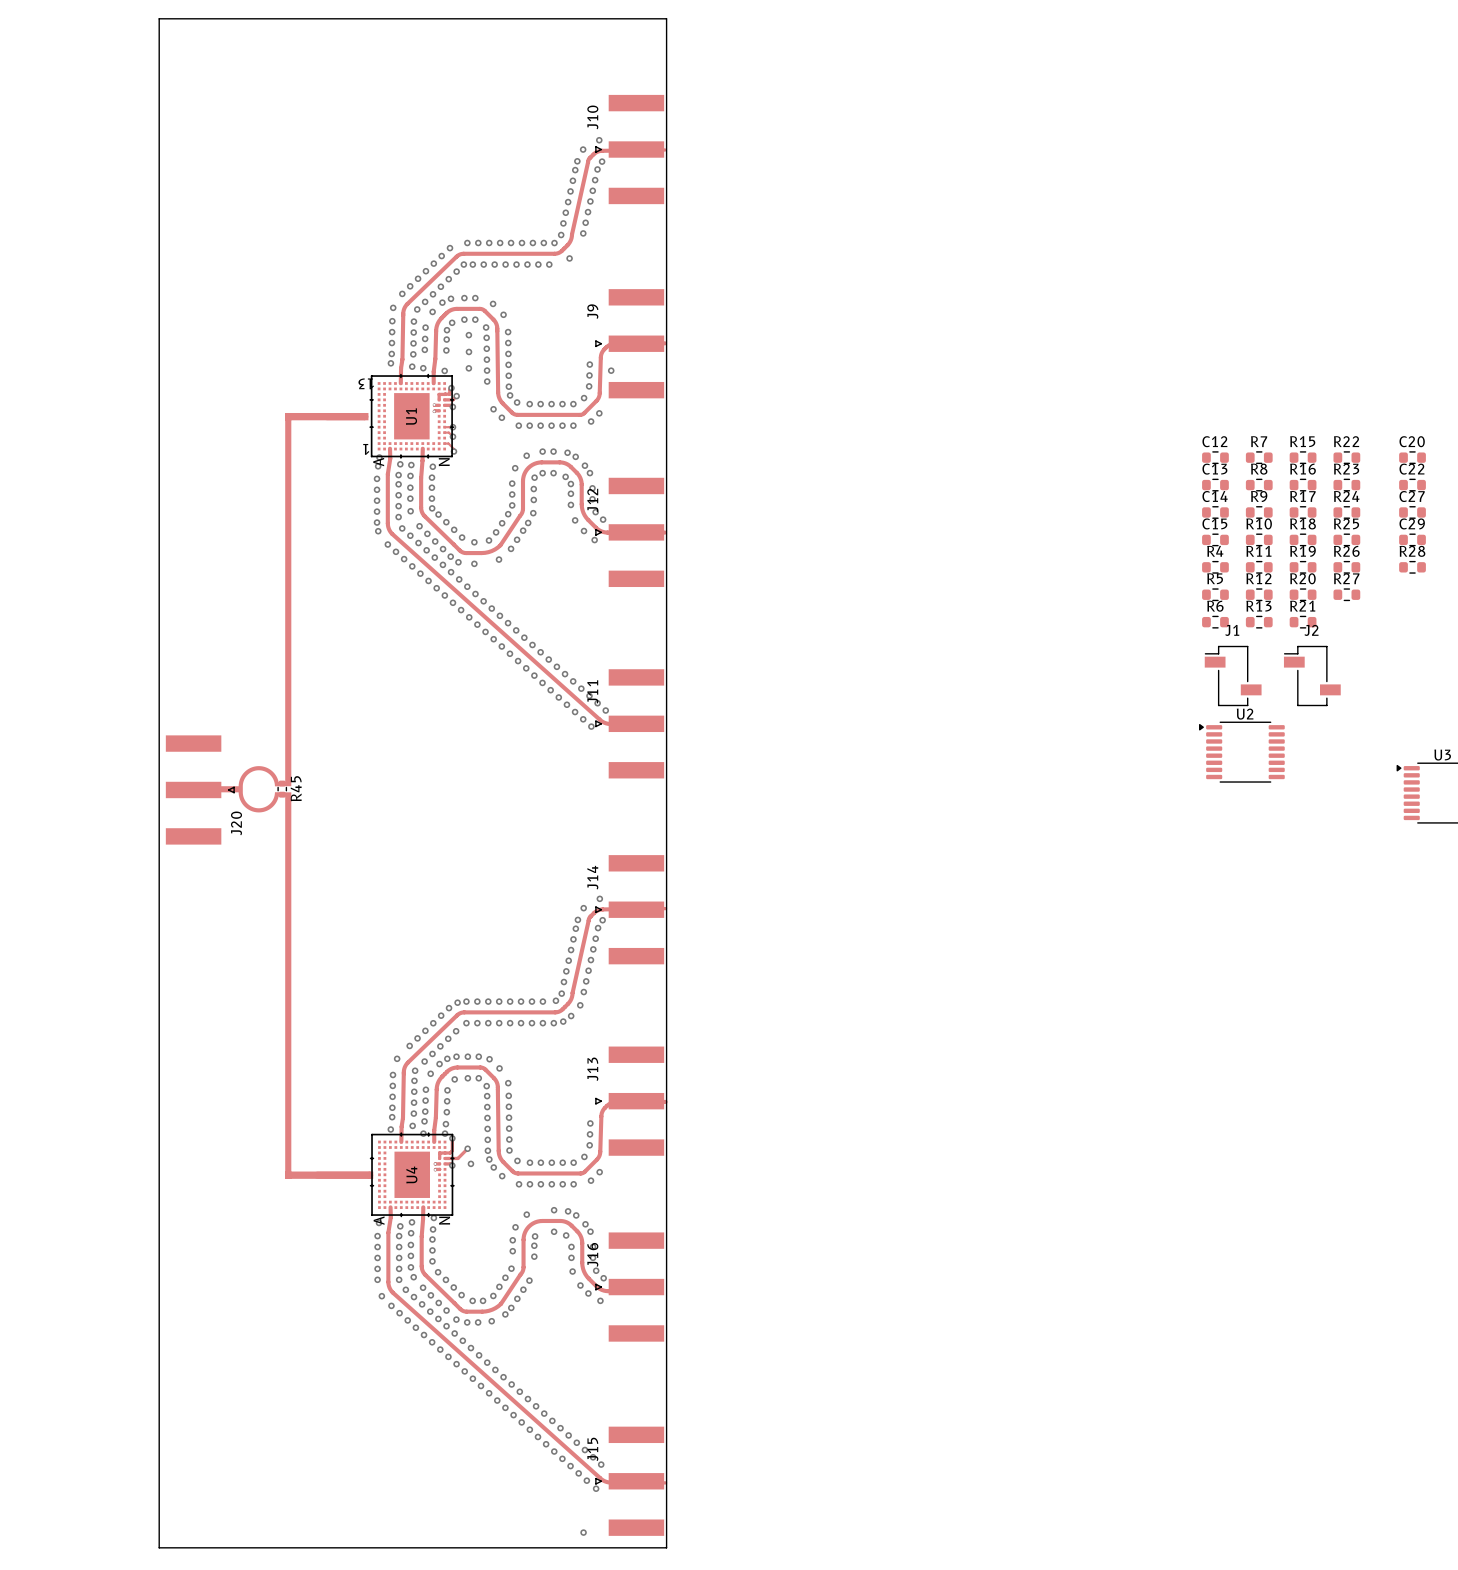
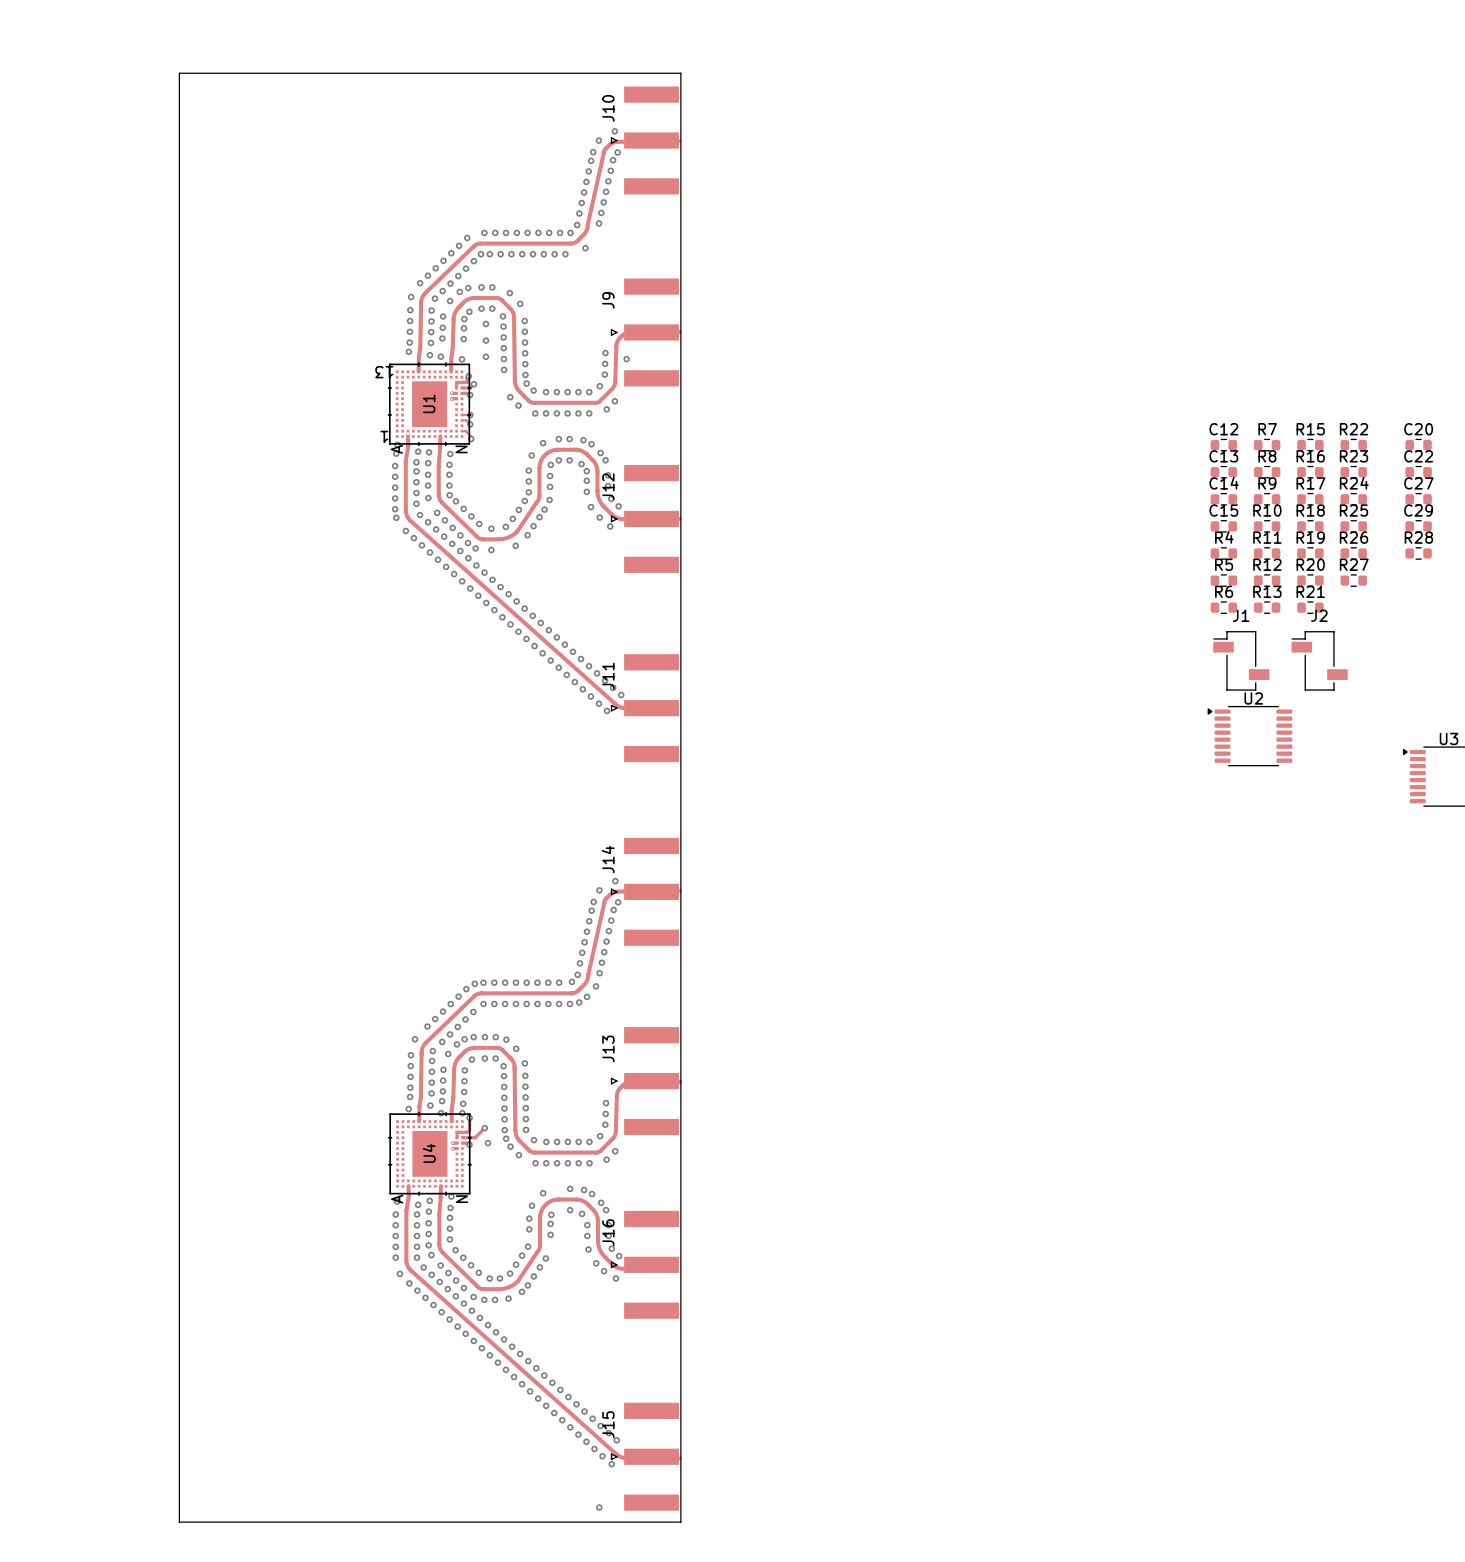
board edge: (159, 18) (666, 18) (666, 1547) (159, 1547) (159, 18) -> (179, 73) (179, 1522) (680, 1522) (680, 73) (179, 73)
drawing: [188, 412, 374, 1179] -> none
J20: (200, 789) -> none
R45: (282, 789) -> none

